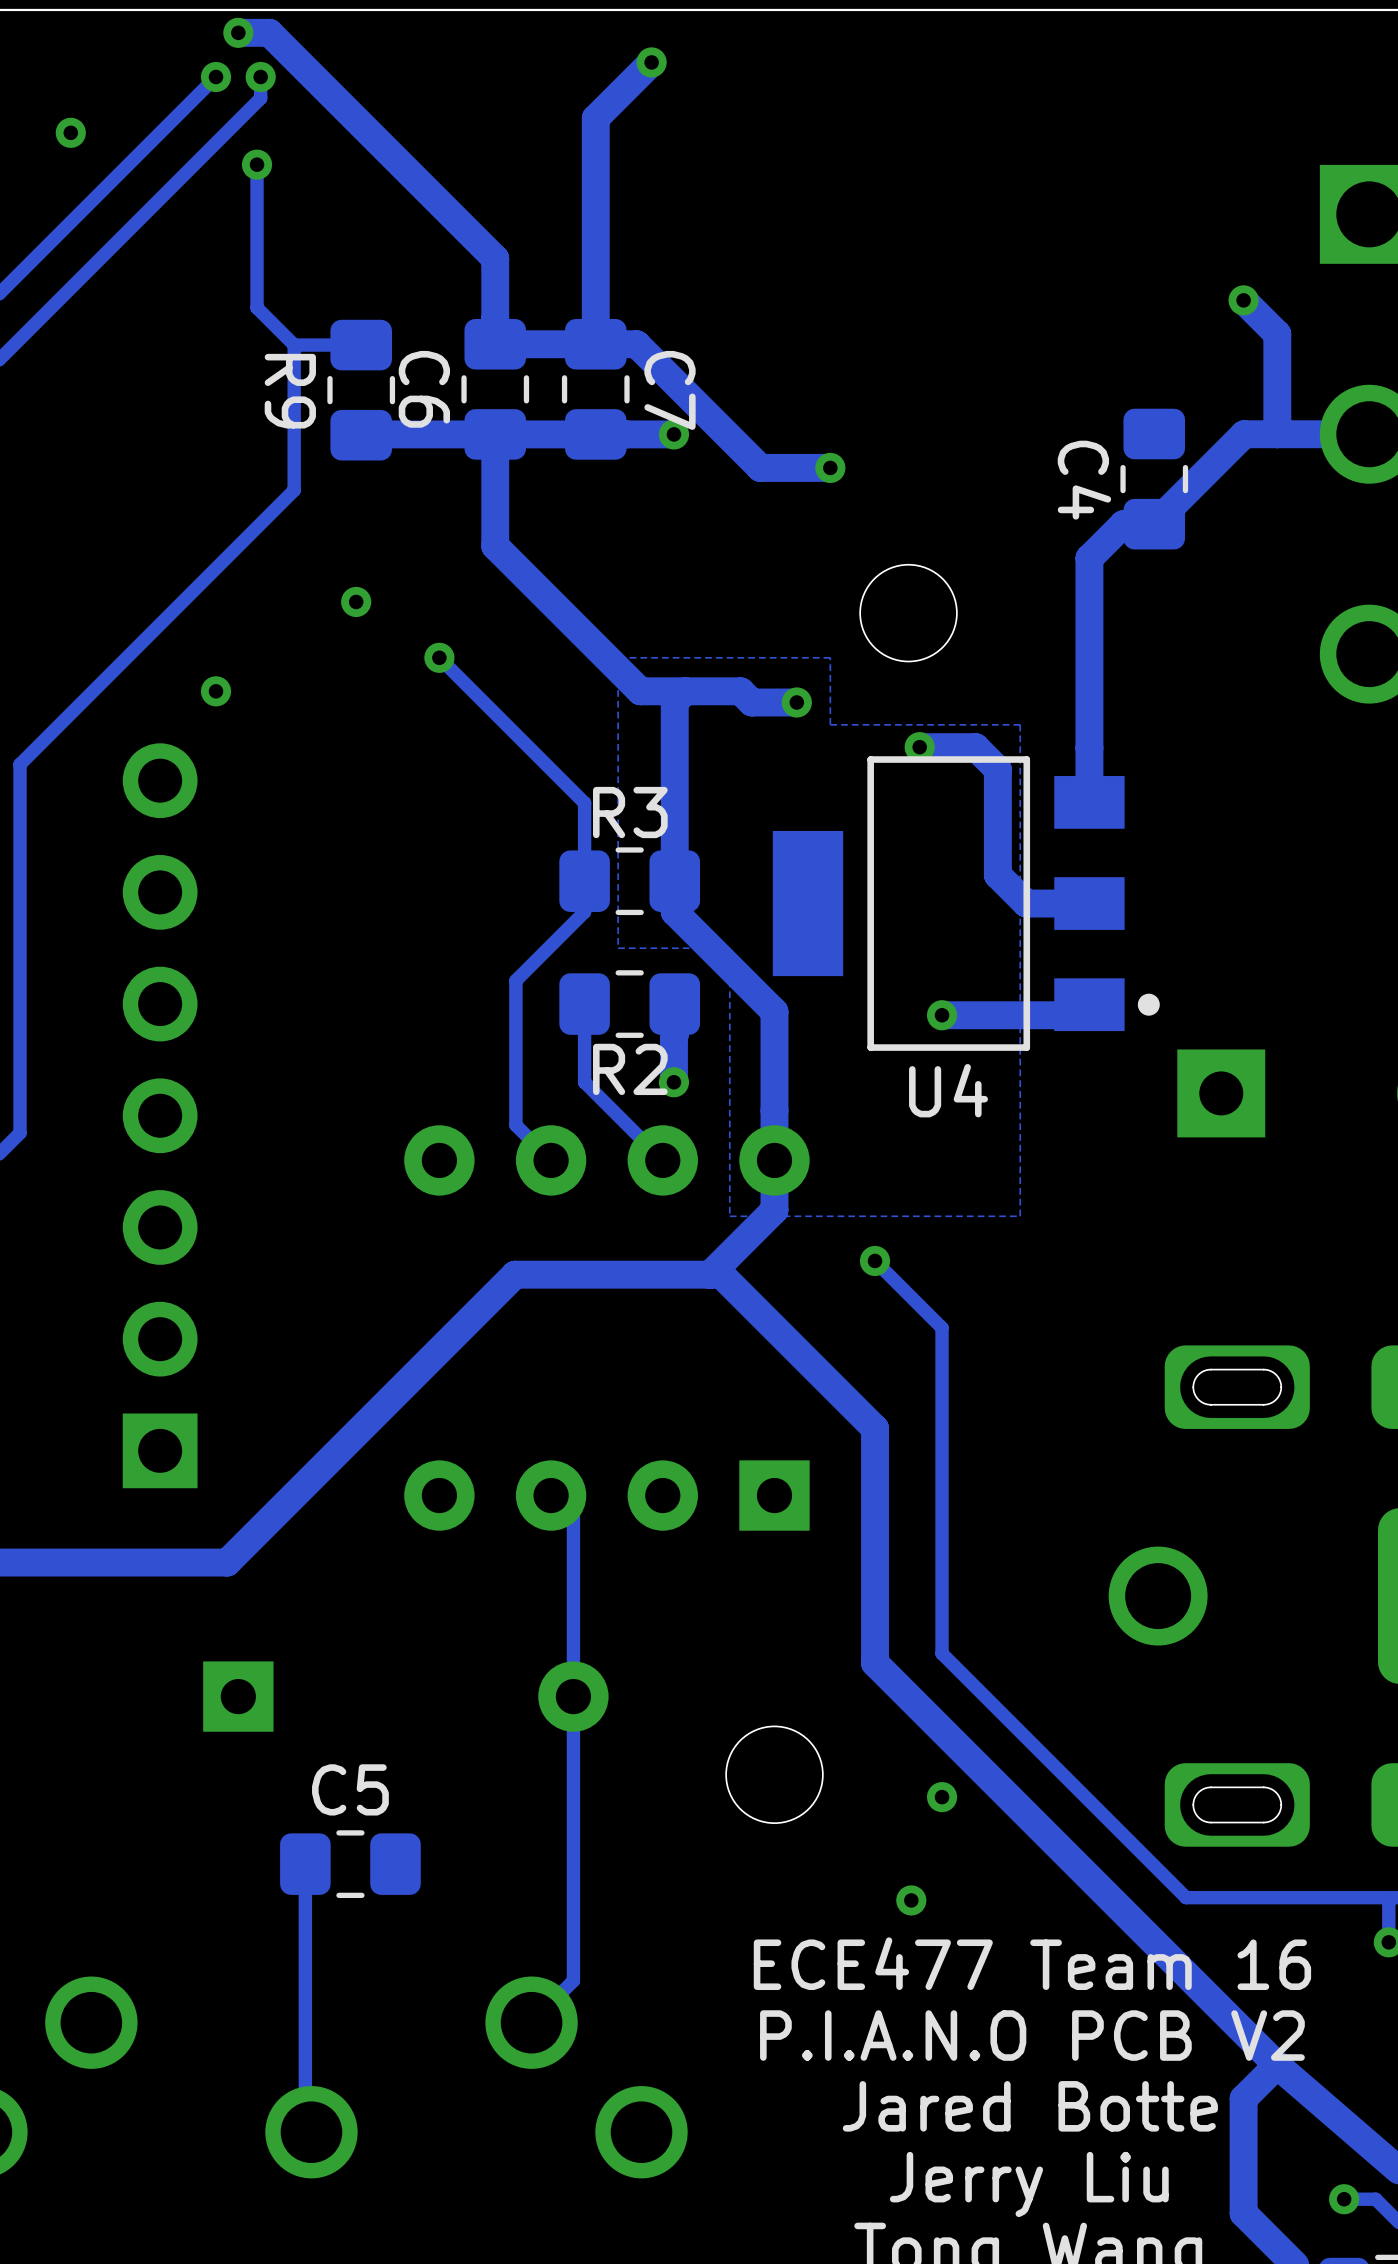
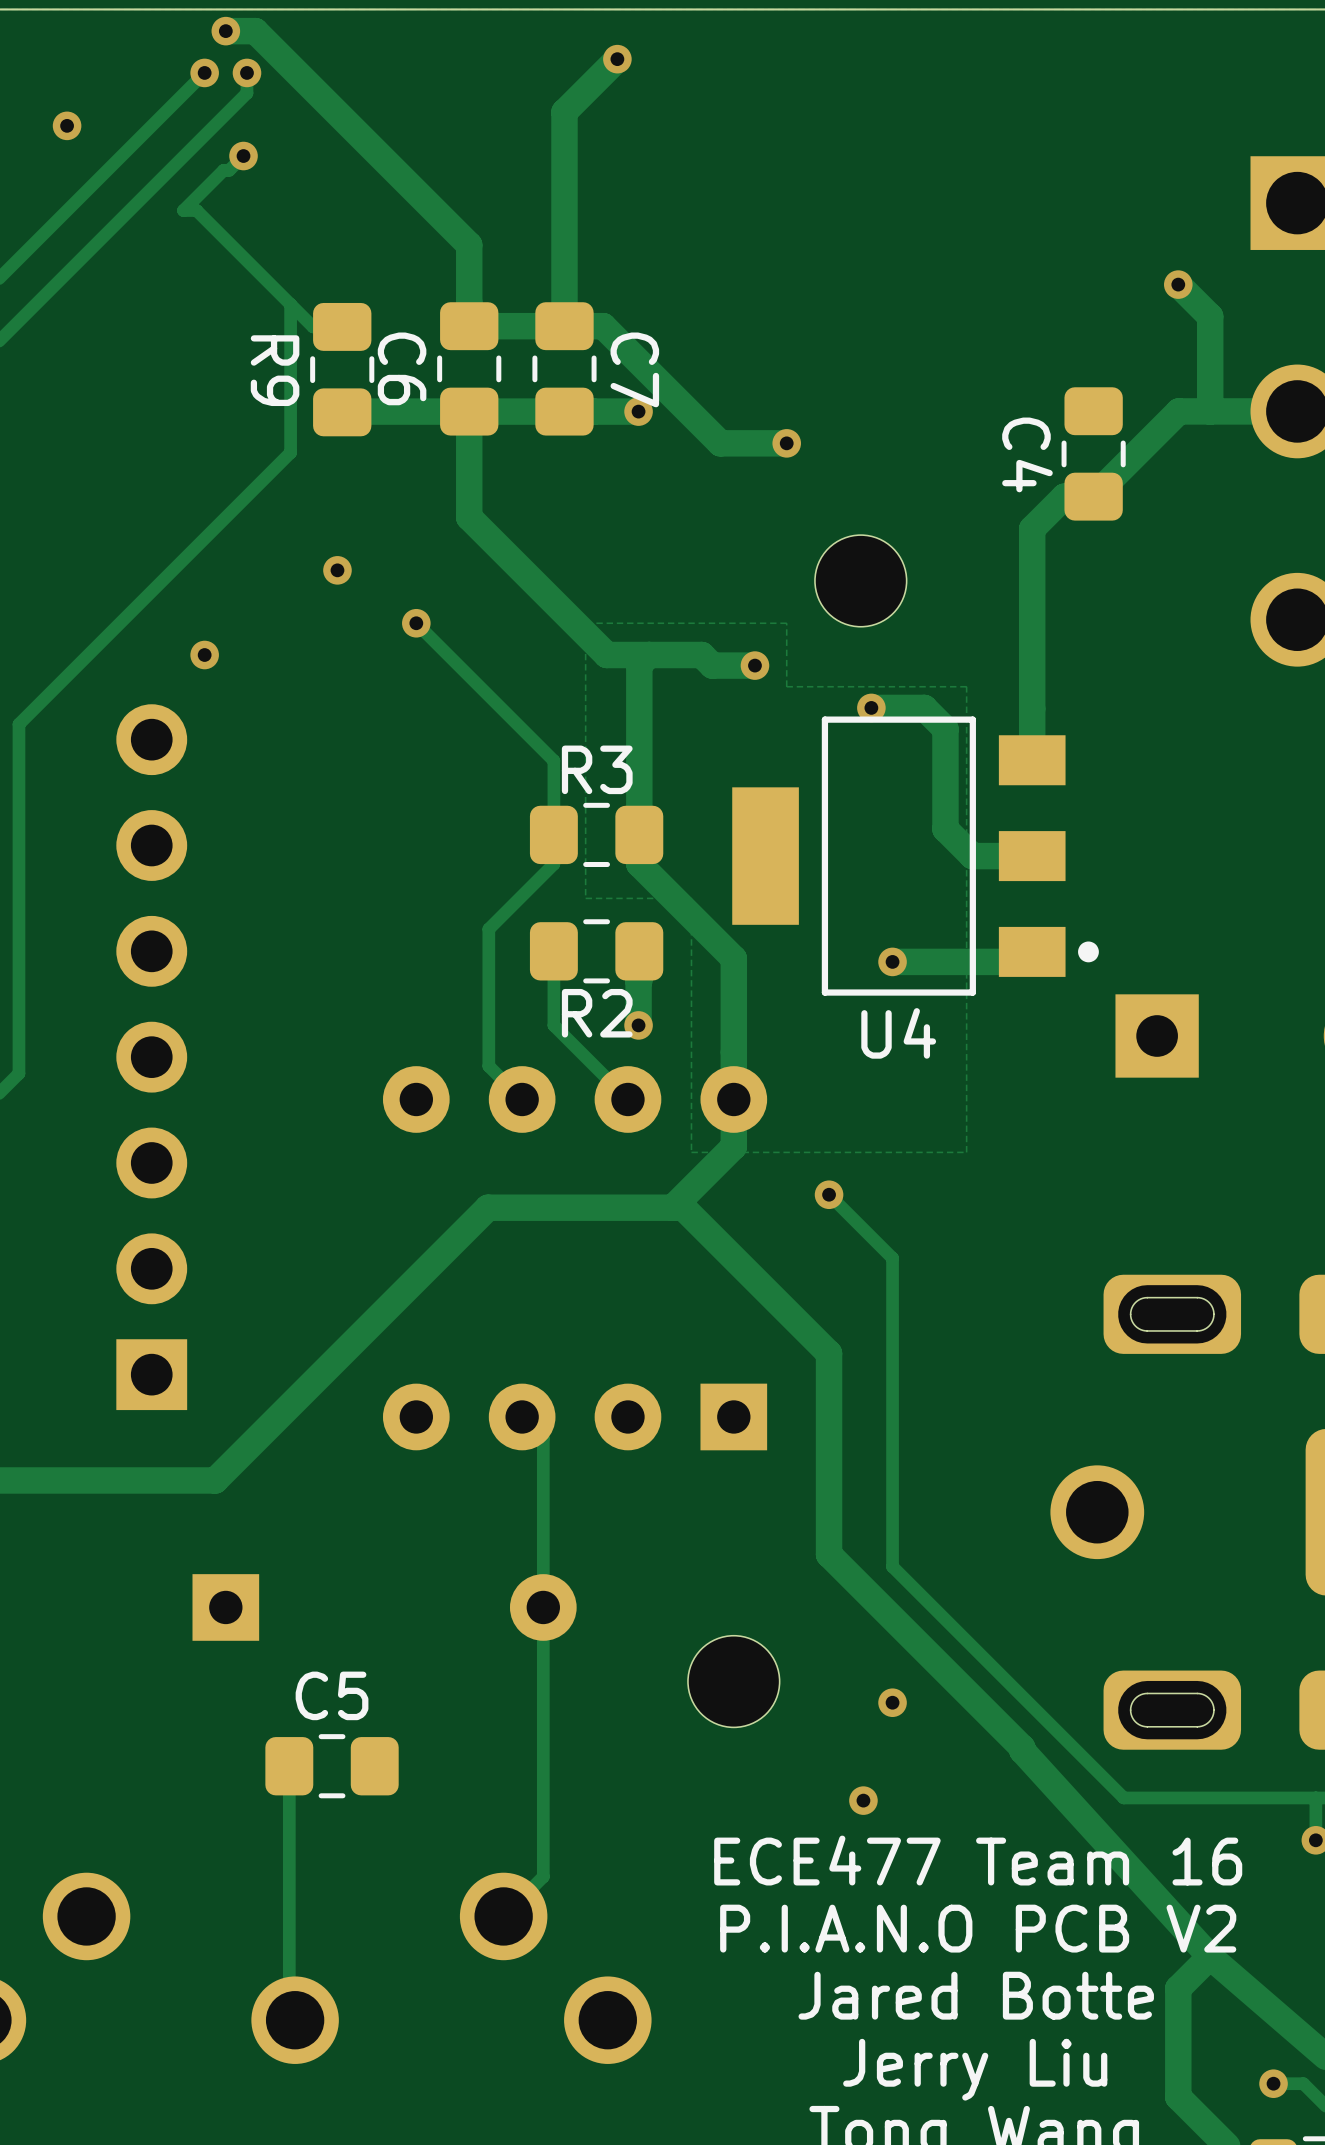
track: (257, 164) (257, 307) (294, 345) -> (243, 156) (229, 170) (223, 170) (183, 210) (196, 210) (313, 326)
track: (294, 345) (294, 490) -> (290, 304) (290, 452) (278, 464)
track: (330, 345) (294, 345) -> none
track: (875, 1640) (875, 1663) (1277, 2065) -> (829, 1554) (1022, 1747) (1022, 1750) (1210, 1956)

